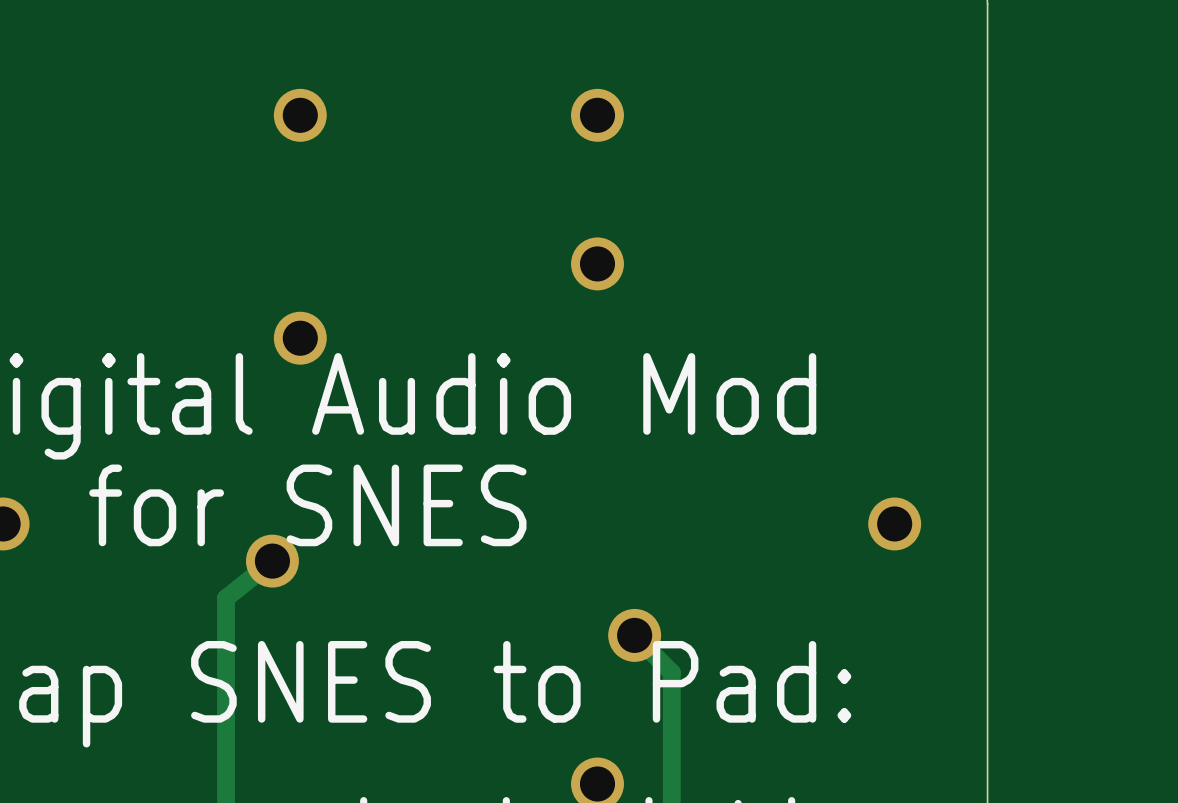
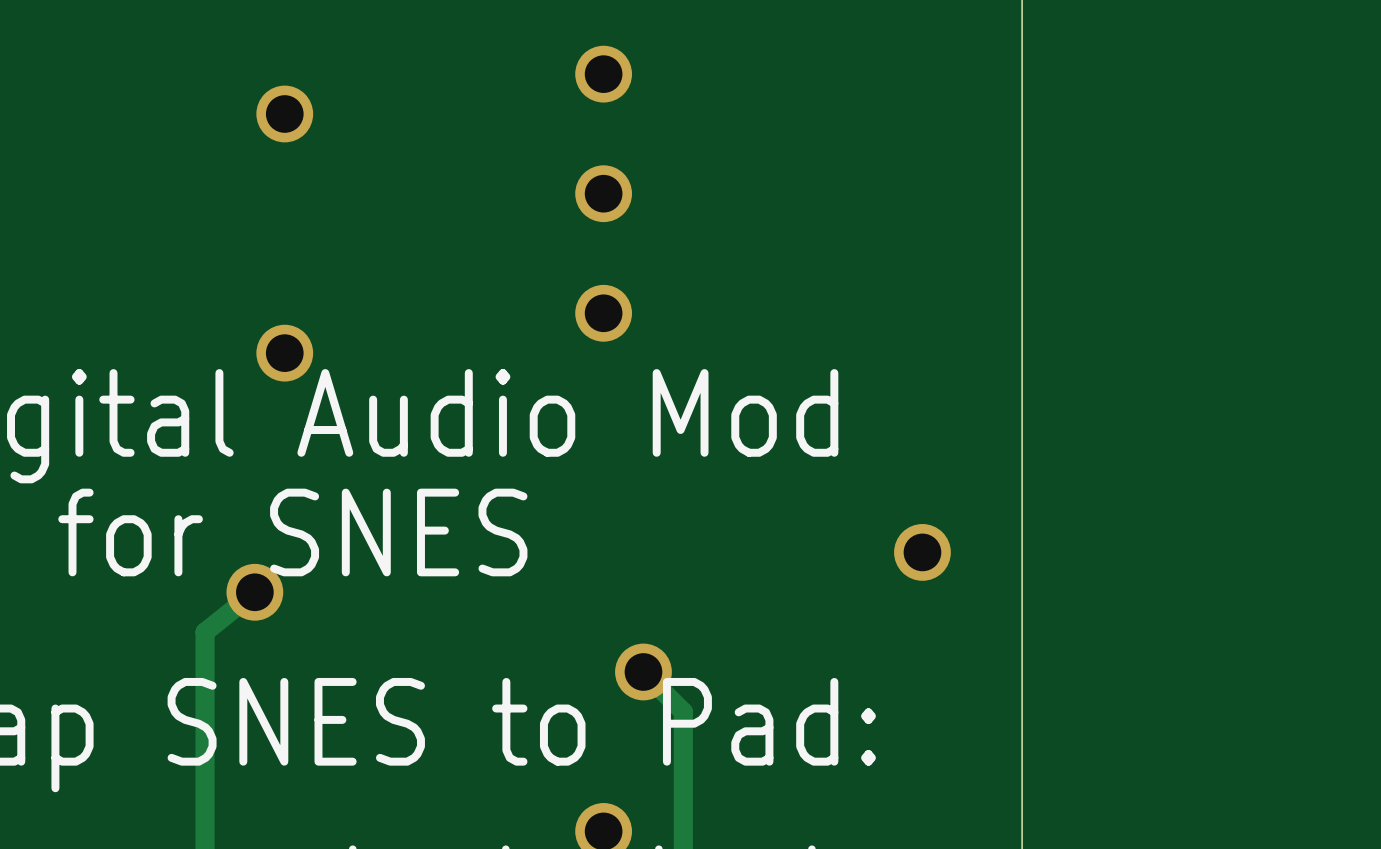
via position: (597, 115) -> (603, 74)
via: none -> (603, 193)
via position: (597, 263) -> (603, 313)

